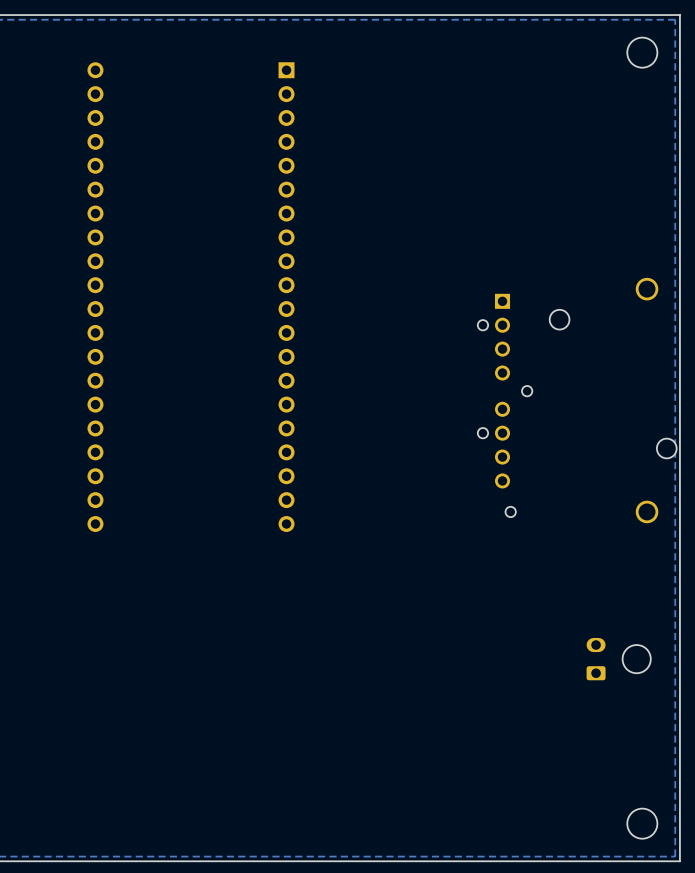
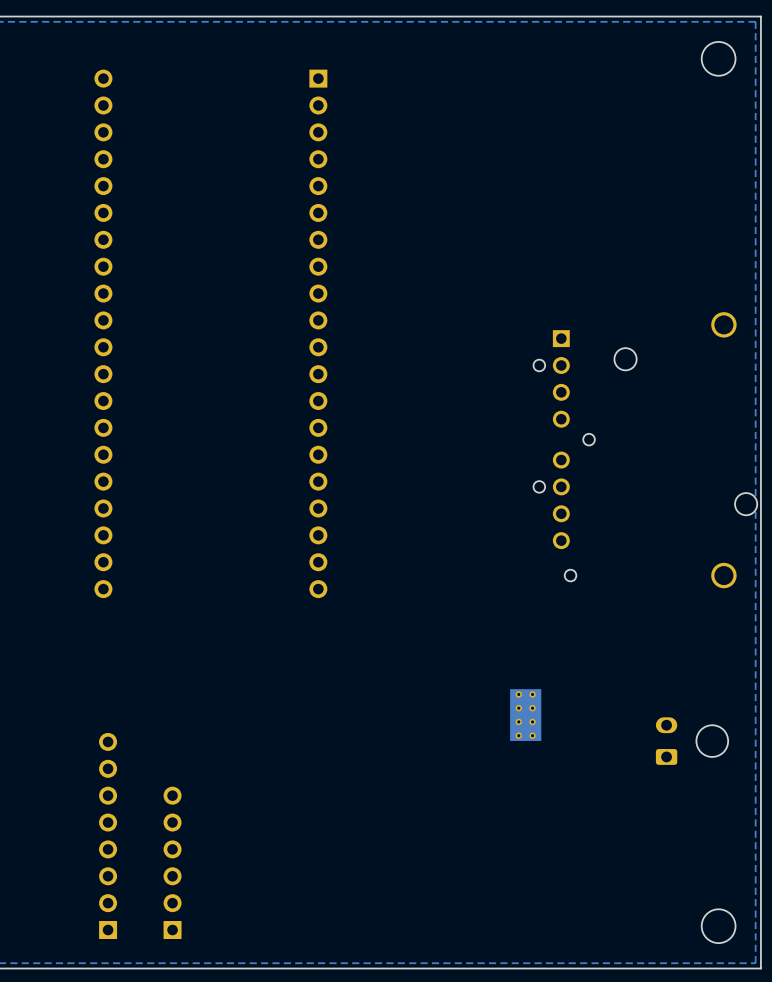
part: none -> (525, 715)
part: none -> (108, 835)
part: none -> (172, 862)

